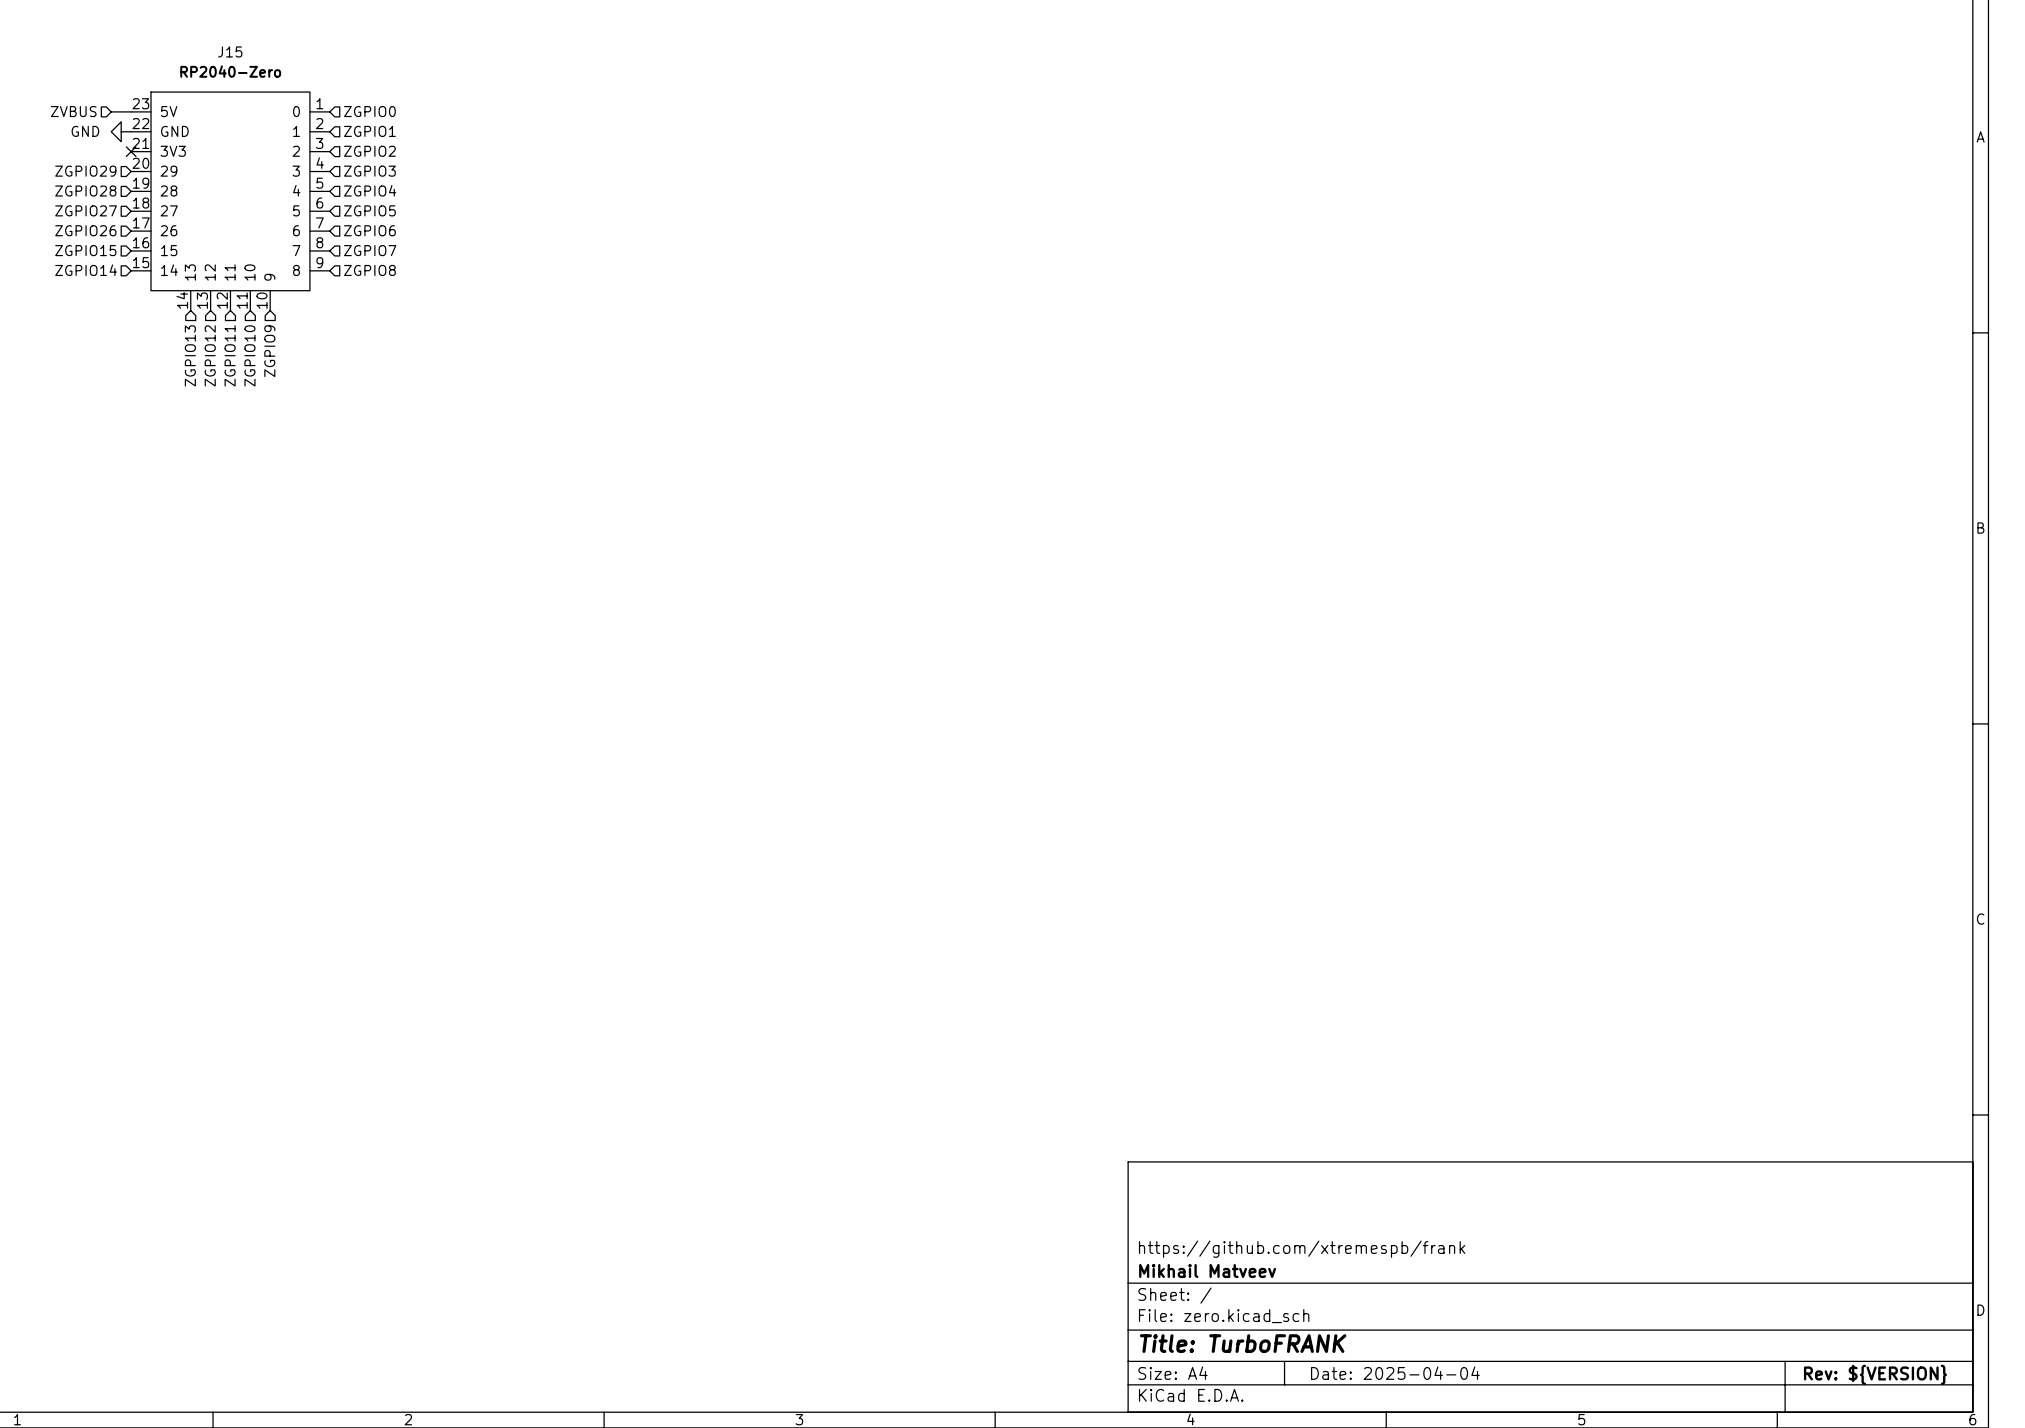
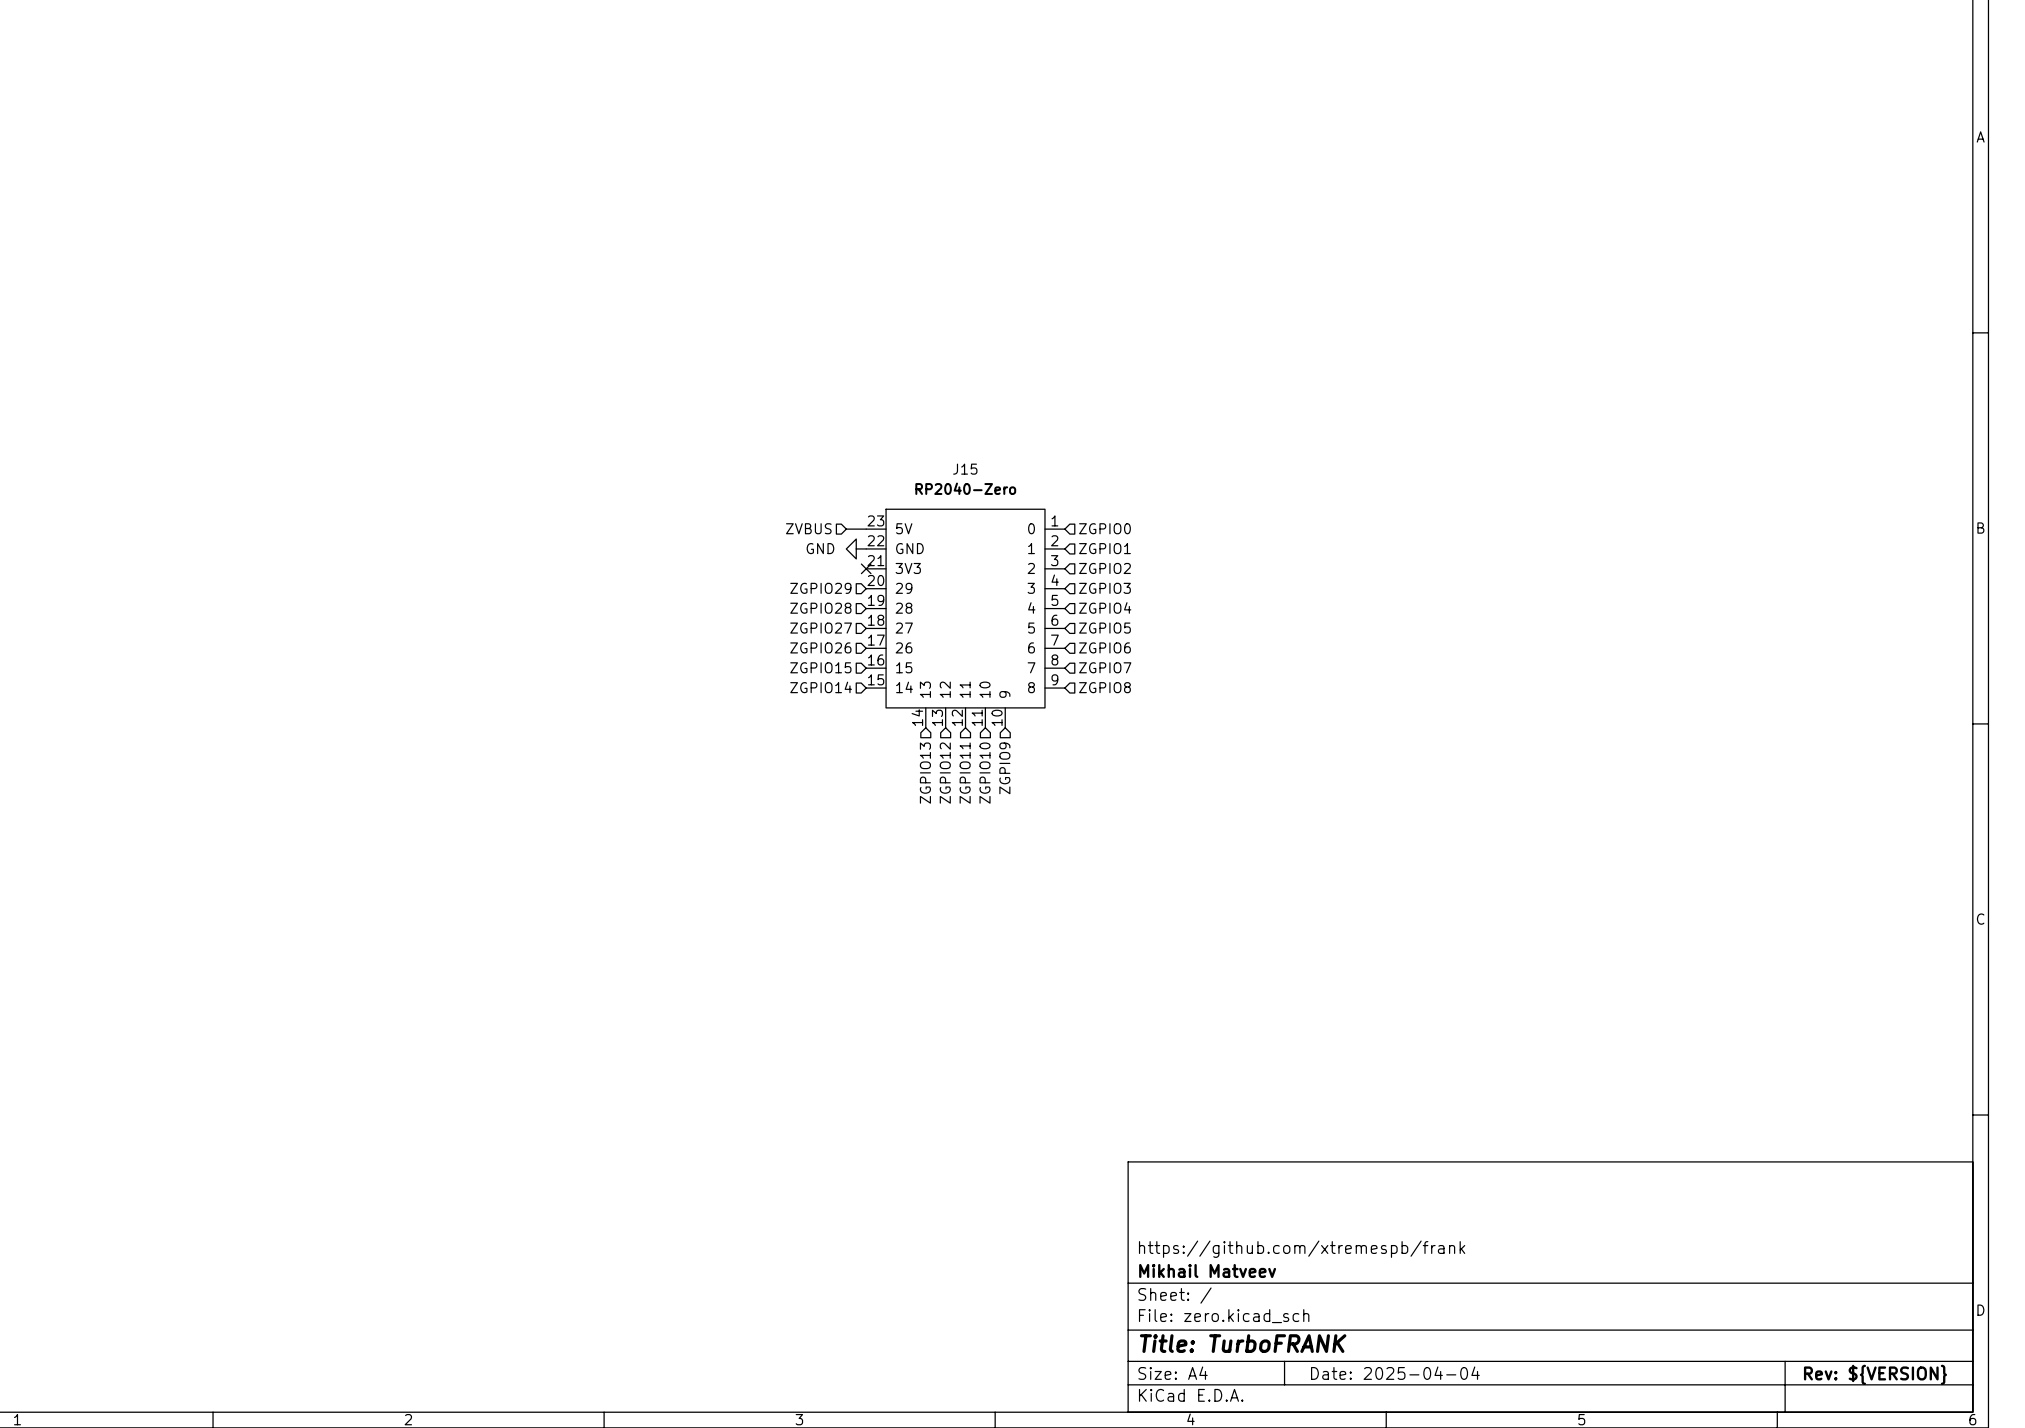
hierarchical label: ZVBUS (73, 111) -> none
wire: (111, 111) (131, 111) -> none
hierarchical label: ZGPIO0 (369, 111) -> none
power symbol: GND (121, 131) -> none
hierarchical label: ZGPIO1 (369, 131) -> none
no-connect mark: (131, 151) -> none
hierarchical label: ZGPIO2 (369, 151) -> none
hierarchical label: ZGPIO29 (85, 171) -> none
hierarchical label: ZGPIO3 (369, 171) -> none
hierarchical label: ZGPIO4 (370, 190) -> none
hierarchical label: ZGPIO28 (85, 191) -> none
J15 position: (230, 201) -> (965, 618)
hierarchical label: ZGPIO27 (86, 210) -> none
hierarchical label: ZGPIO5 (369, 210) -> none
hierarchical label: ZGPIO26 (85, 230) -> none
hierarchical label: ZGPIO6 (369, 230) -> none
hierarchical label: ZGPIO15 (85, 250) -> none
hierarchical label: ZGPIO7 (370, 250) -> none
hierarchical label: ZGPIO14 (86, 270) -> none
hierarchical label: ZGPIO8 (369, 270) -> none
hierarchical label: ZGPIO9 (269, 351) -> none
hierarchical label: ZGPIO13 (190, 355) -> none
hierarchical label: ZGPIO12 (210, 355) -> none
hierarchical label: ZGPIO11 (230, 355) -> none
hierarchical label: ZGPIO10 (249, 355) -> none
hierarchical label: none -> ZVBUS (808, 528)
hierarchical label: none -> ZGPIO0 (1104, 528)
wire: none -> (846, 529) (866, 529)
power symbol: none -> GND (856, 548)
hierarchical label: none -> ZGPIO1 (1104, 548)
no-connect mark: none -> (866, 568)
hierarchical label: none -> ZGPIO2 (1104, 568)
hierarchical label: none -> ZGPIO29 (820, 588)
hierarchical label: none -> ZGPIO3 (1104, 588)
hierarchical label: none -> ZGPIO4 (1105, 607)
hierarchical label: none -> ZGPIO28 (820, 608)
hierarchical label: none -> ZGPIO27 (821, 628)
hierarchical label: none -> ZGPIO5 (1104, 628)
hierarchical label: none -> ZGPIO26 (820, 647)
hierarchical label: none -> ZGPIO6 (1104, 647)
hierarchical label: none -> ZGPIO15 (820, 667)
hierarchical label: none -> ZGPIO7 (1105, 667)
hierarchical label: none -> ZGPIO14 (821, 687)
hierarchical label: none -> ZGPIO8 (1104, 687)
hierarchical label: none -> ZGPIO9 (1004, 768)
hierarchical label: none -> ZGPIO13 (925, 773)
hierarchical label: none -> ZGPIO12 (945, 773)
hierarchical label: none -> ZGPIO11 (965, 773)
hierarchical label: none -> ZGPIO10 (985, 773)

